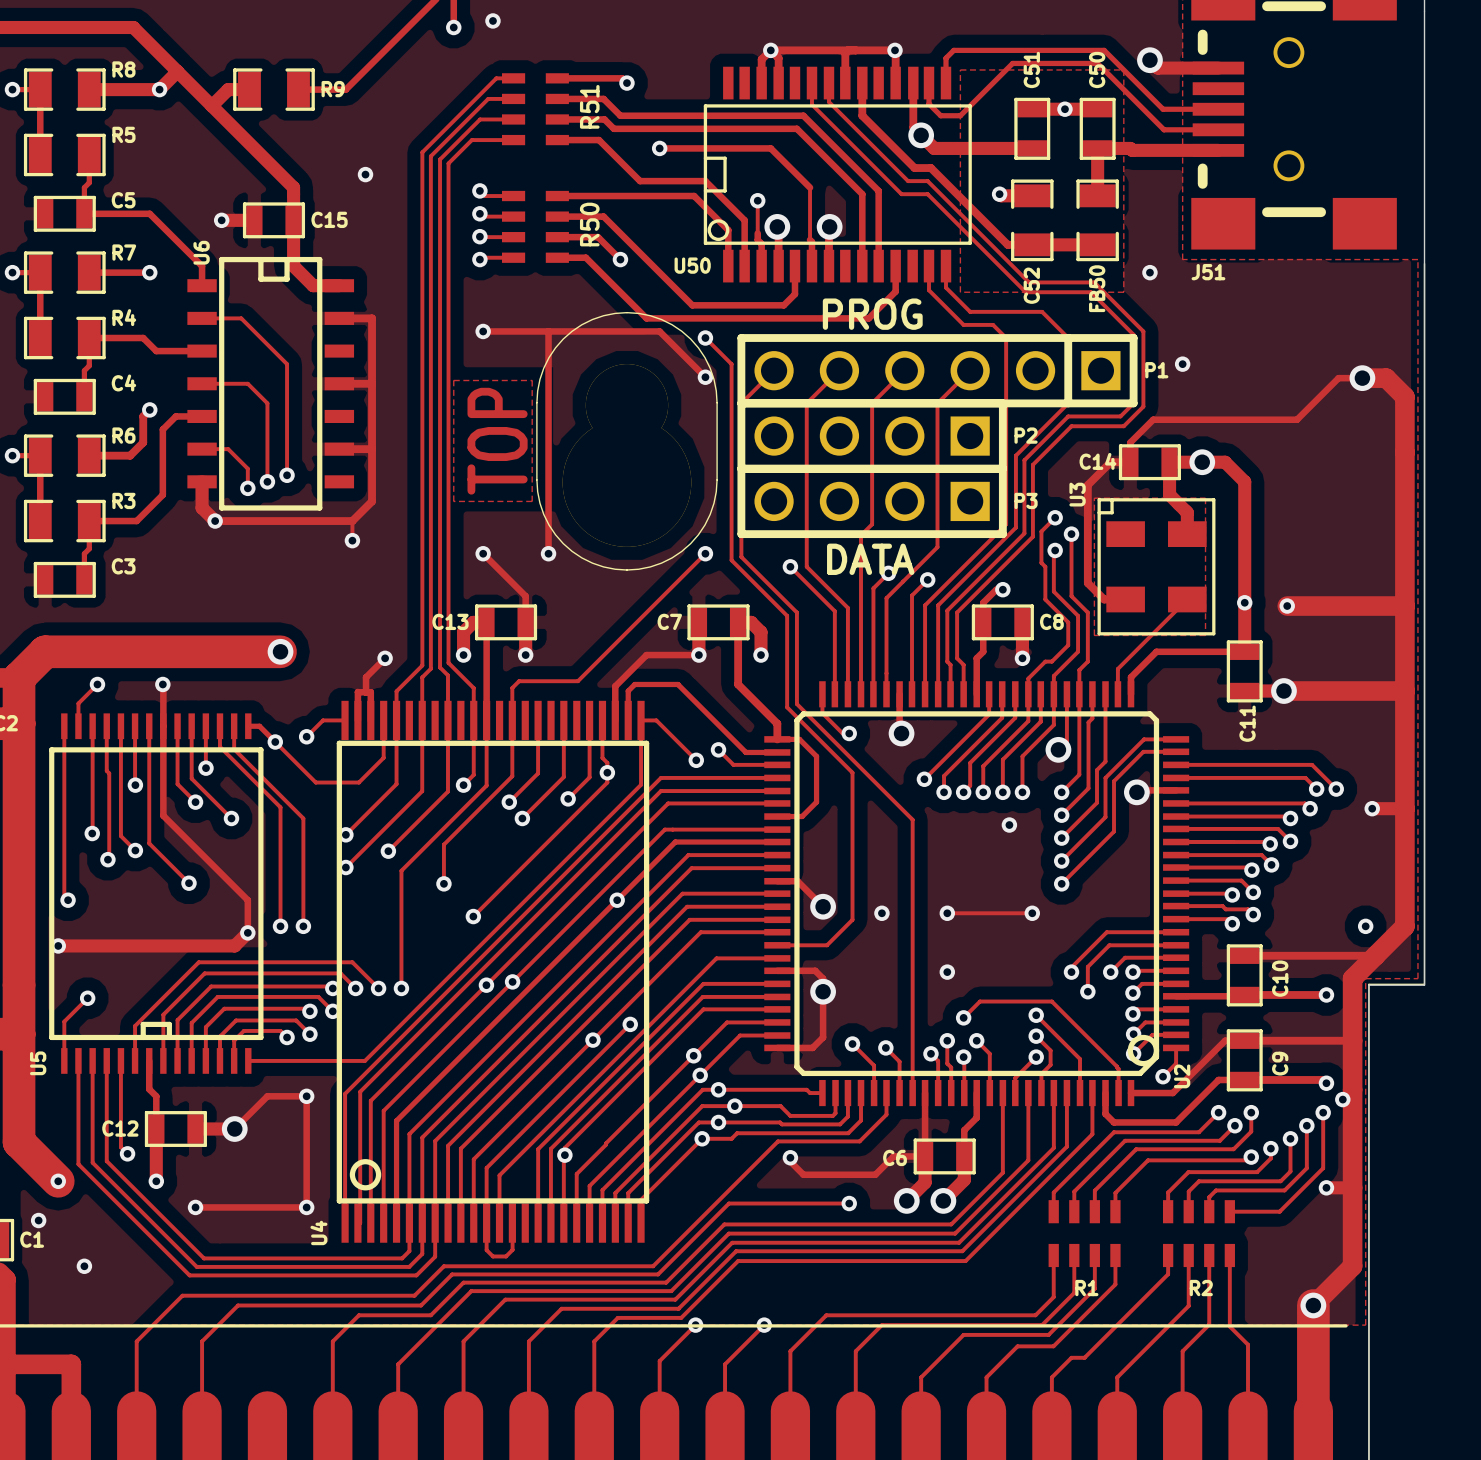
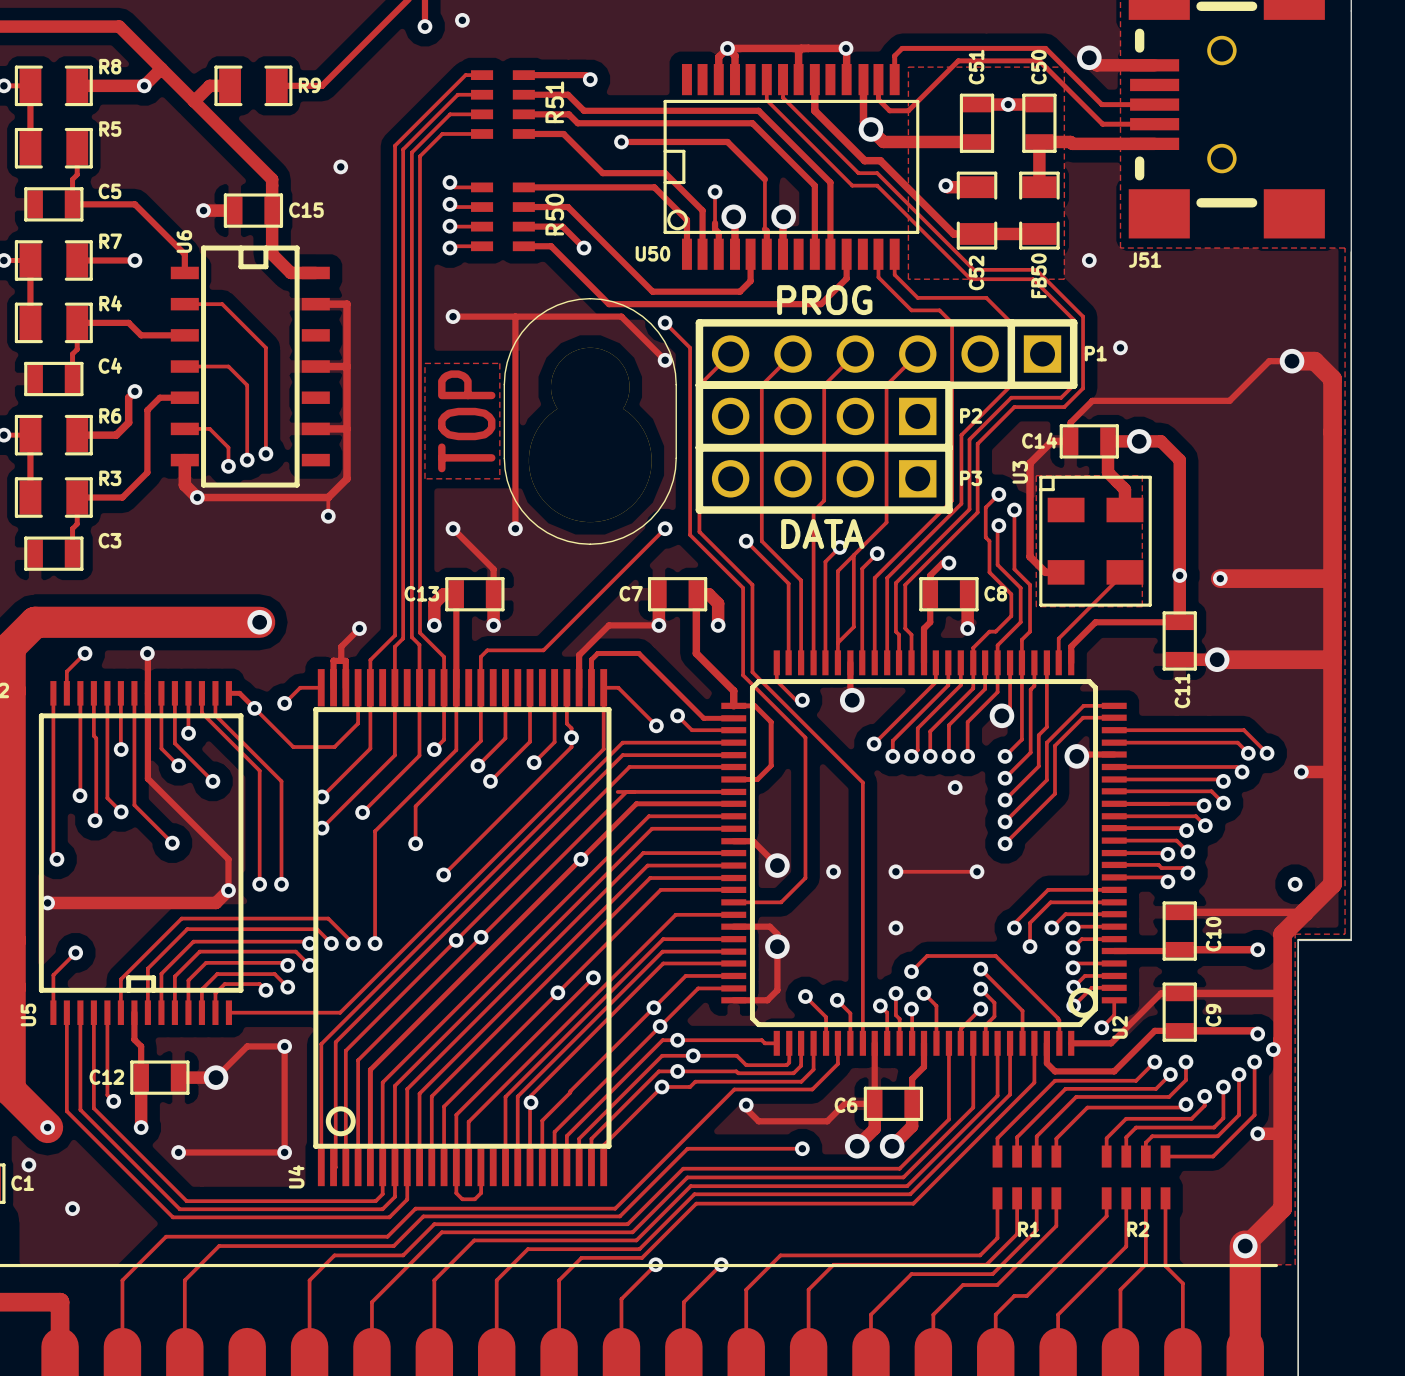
track: none -> (853, 555) (853, 626) (837, 642)
track: none -> (617, 791) (626, 791)

